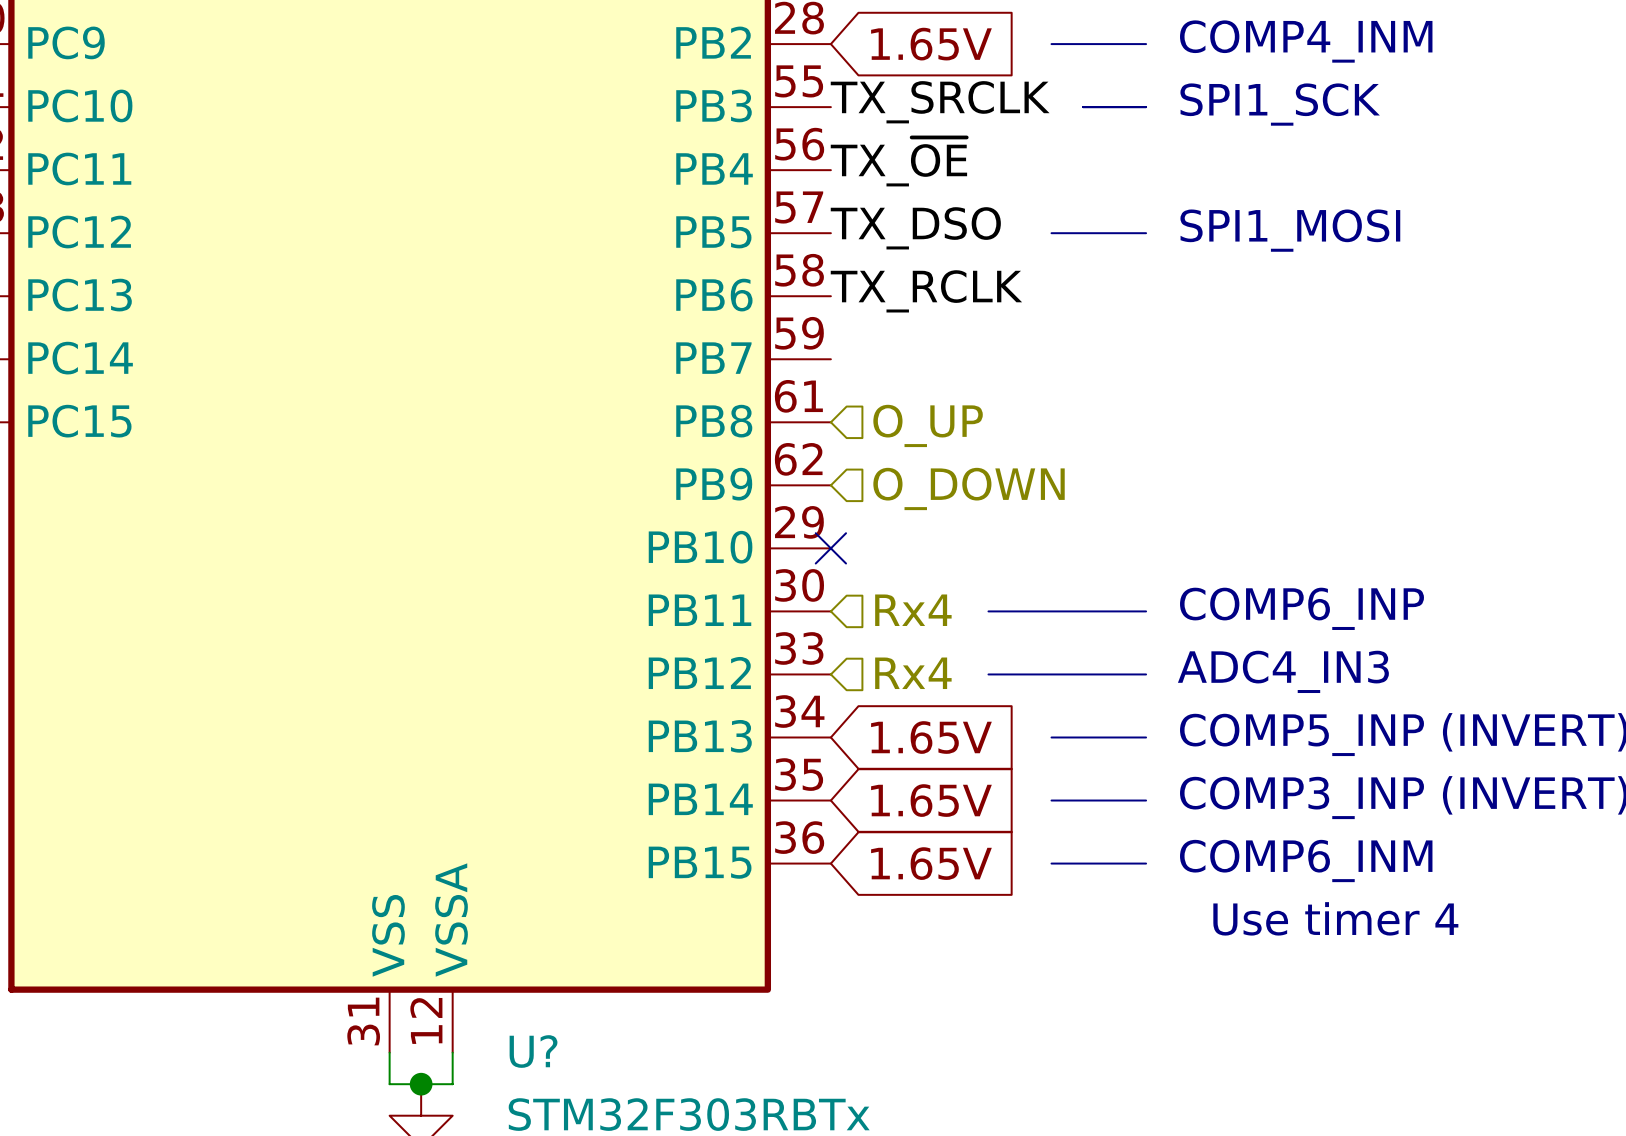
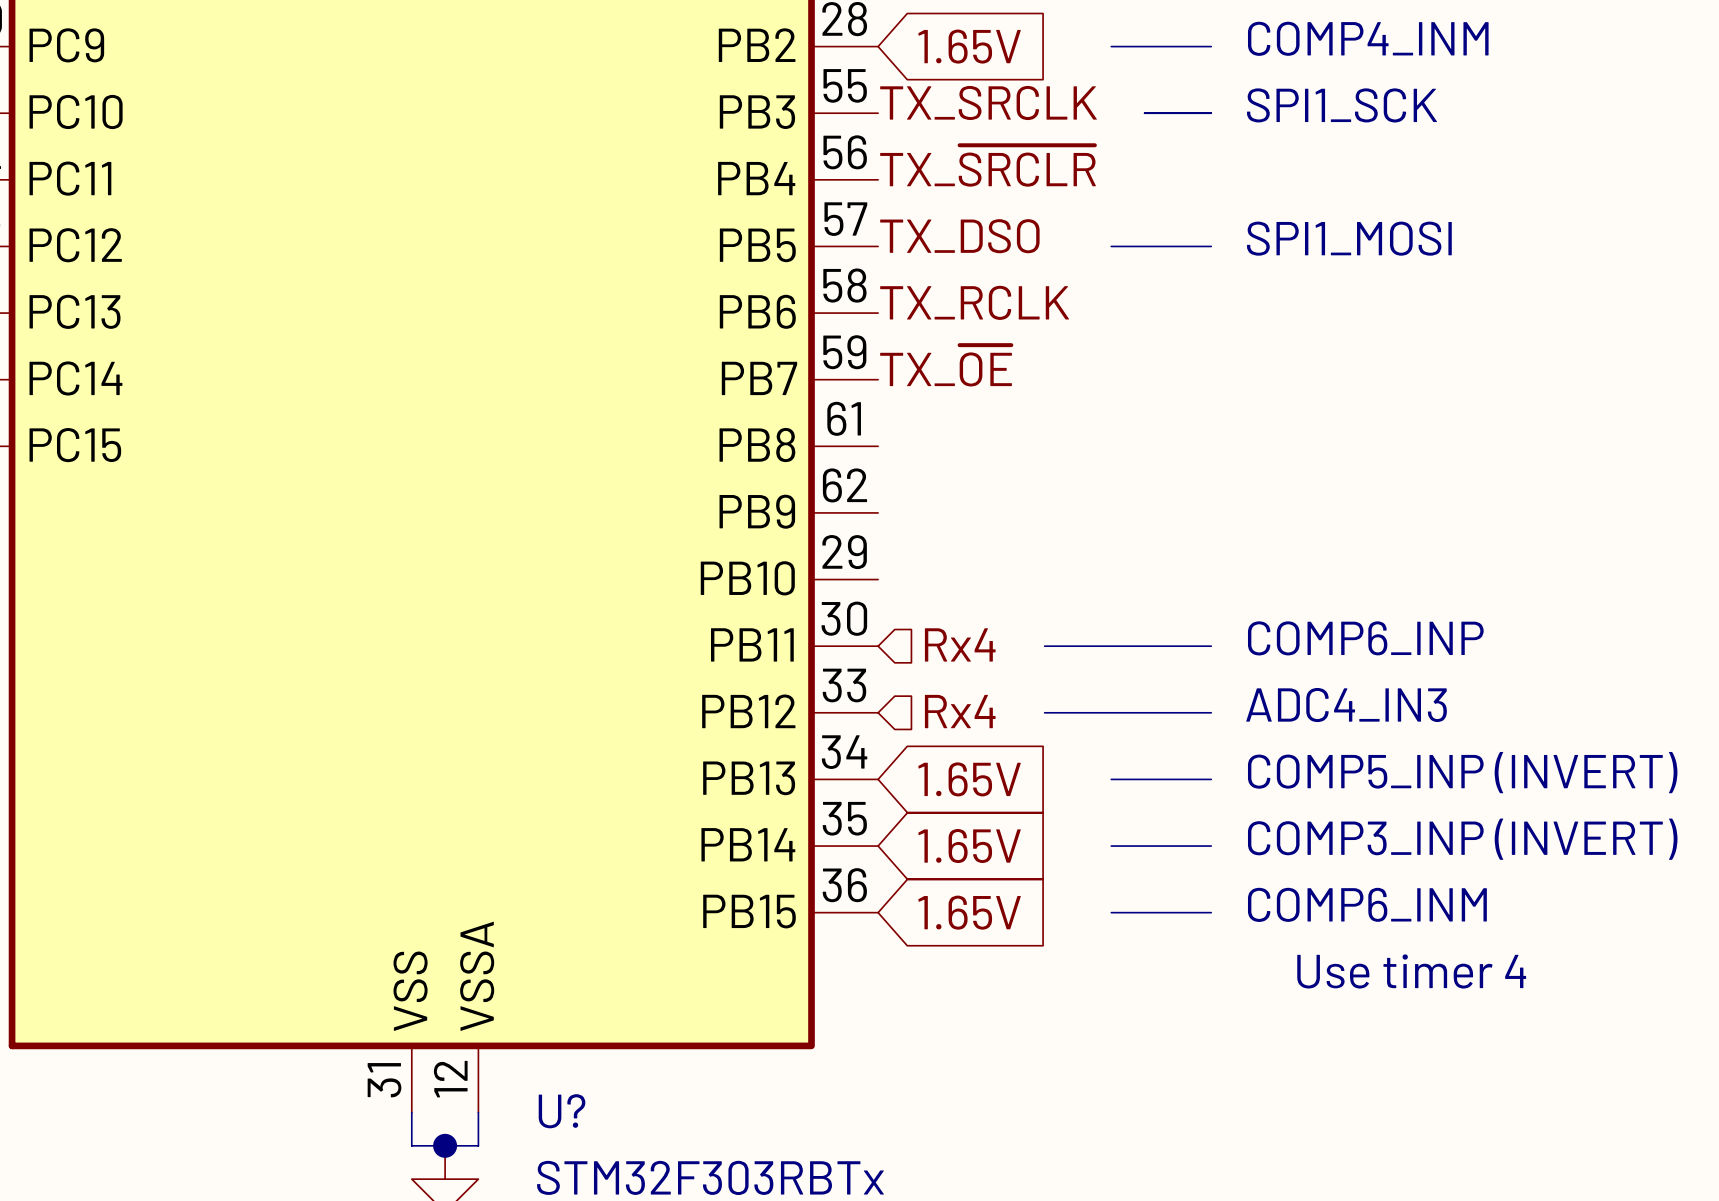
label: TX_~{OE} (898, 161) -> TX_~{SRCLR} (988, 165)
label: none -> TX_~{OE} (946, 365)
hierarchical label: O_UP (928, 425) -> none
hierarchical label: O_DOWN (969, 488) -> none
no-connect mark: (830, 548) -> none

